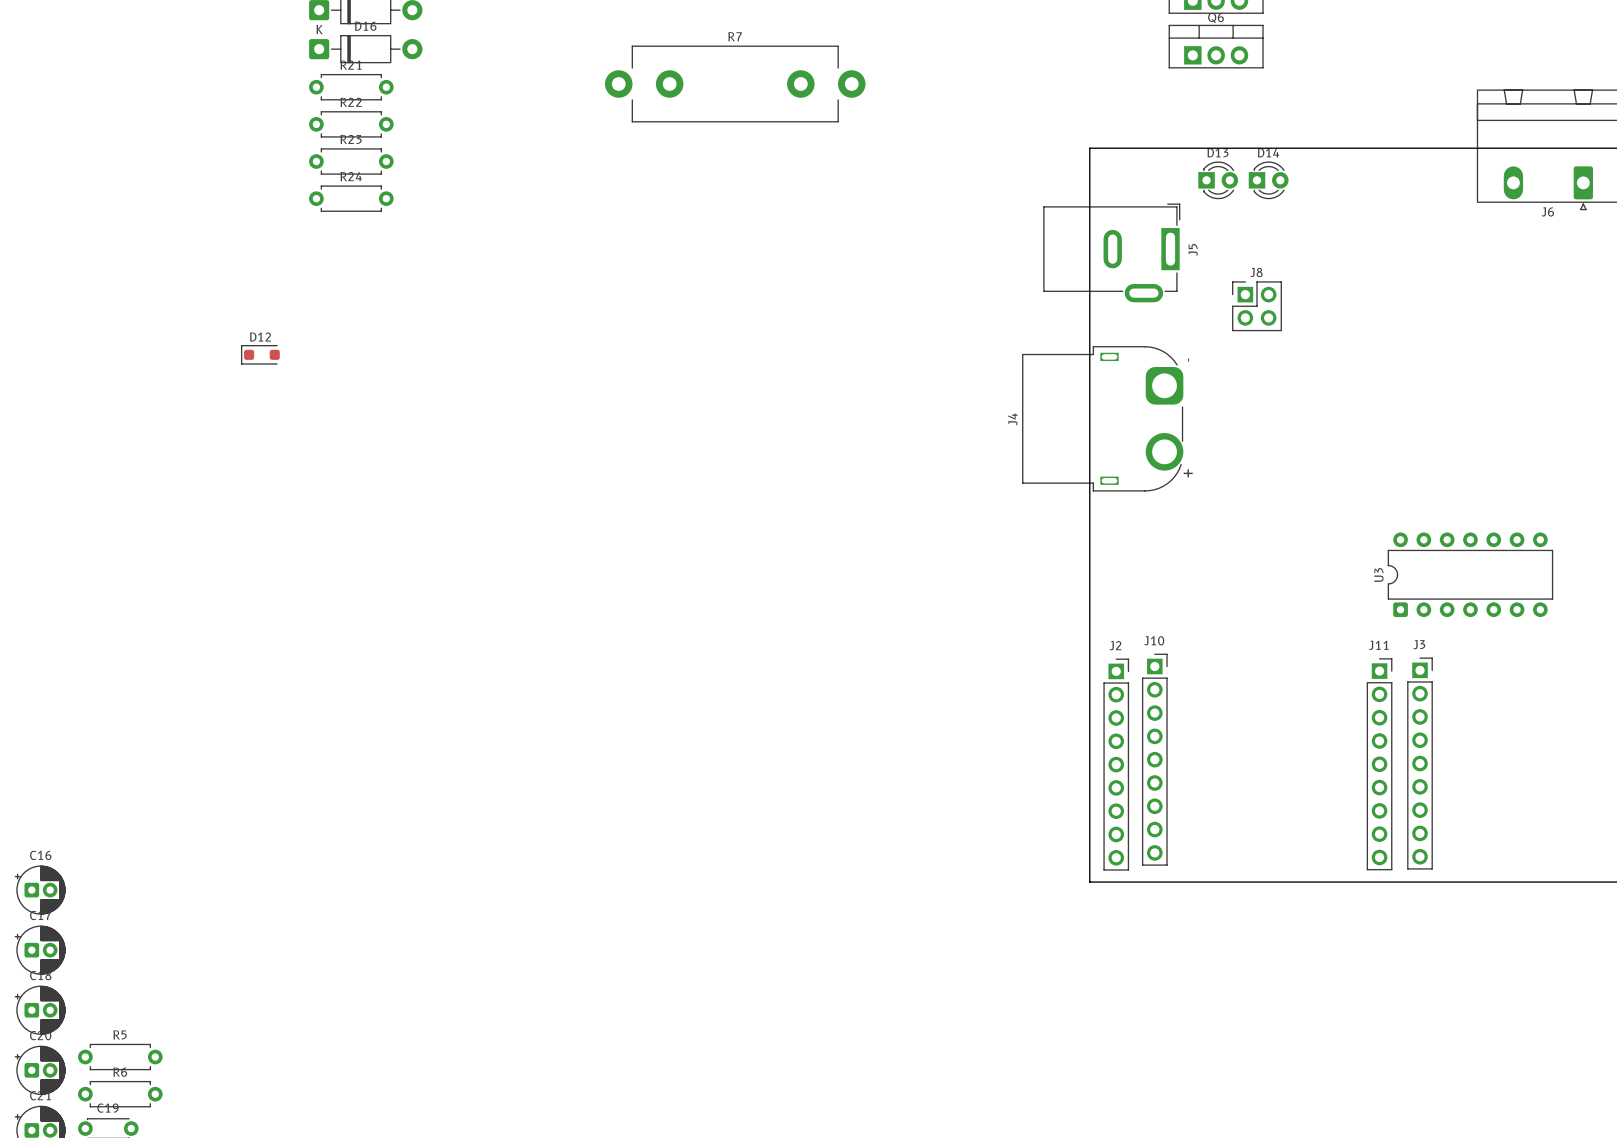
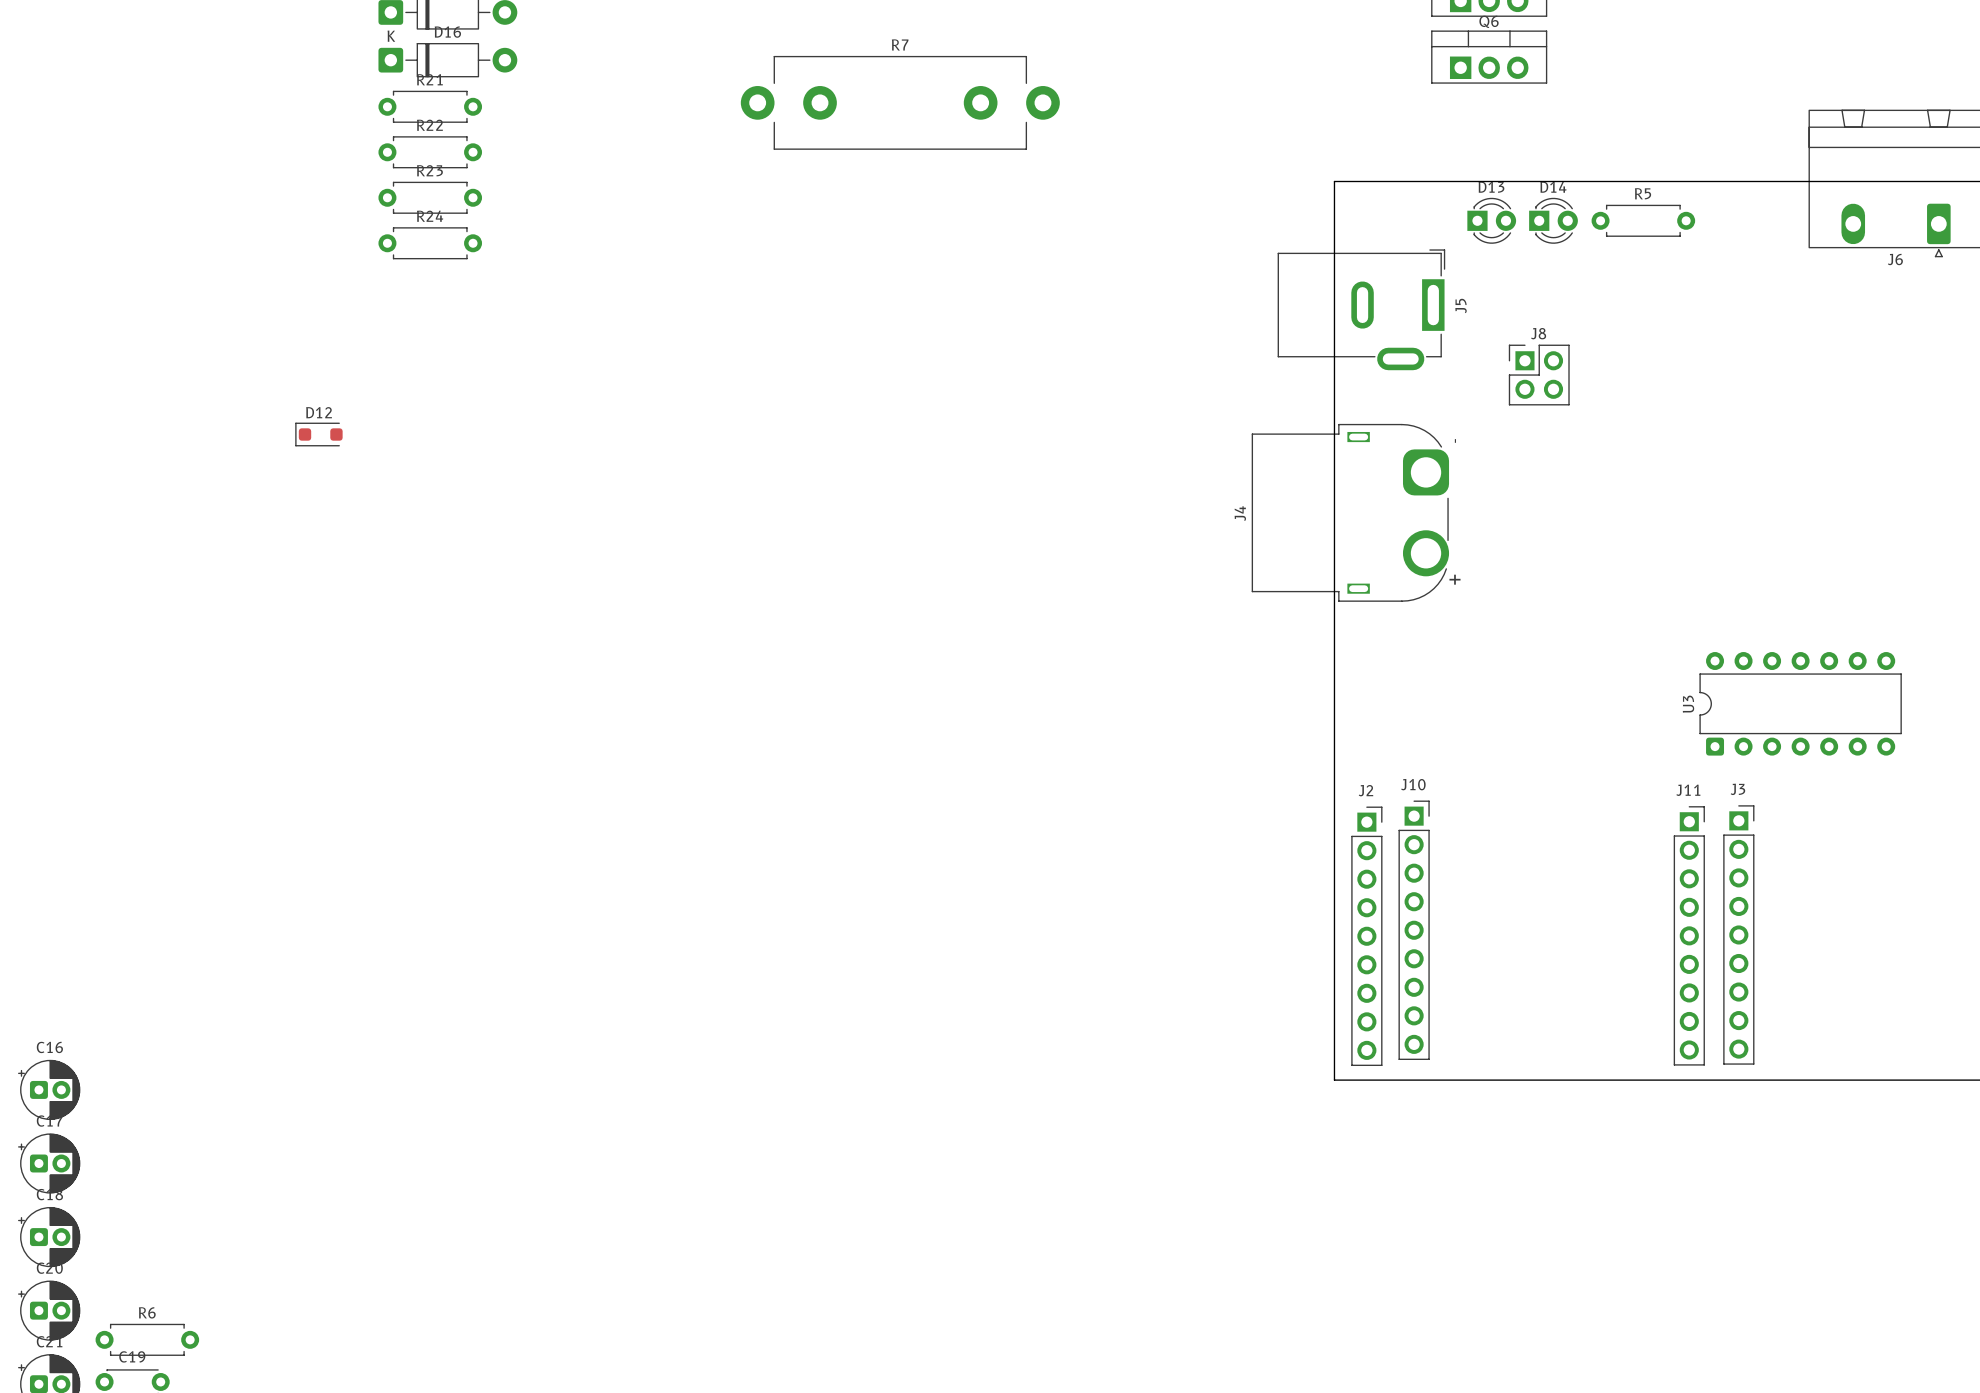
R5 position: (120, 1057) -> (1643, 220)

